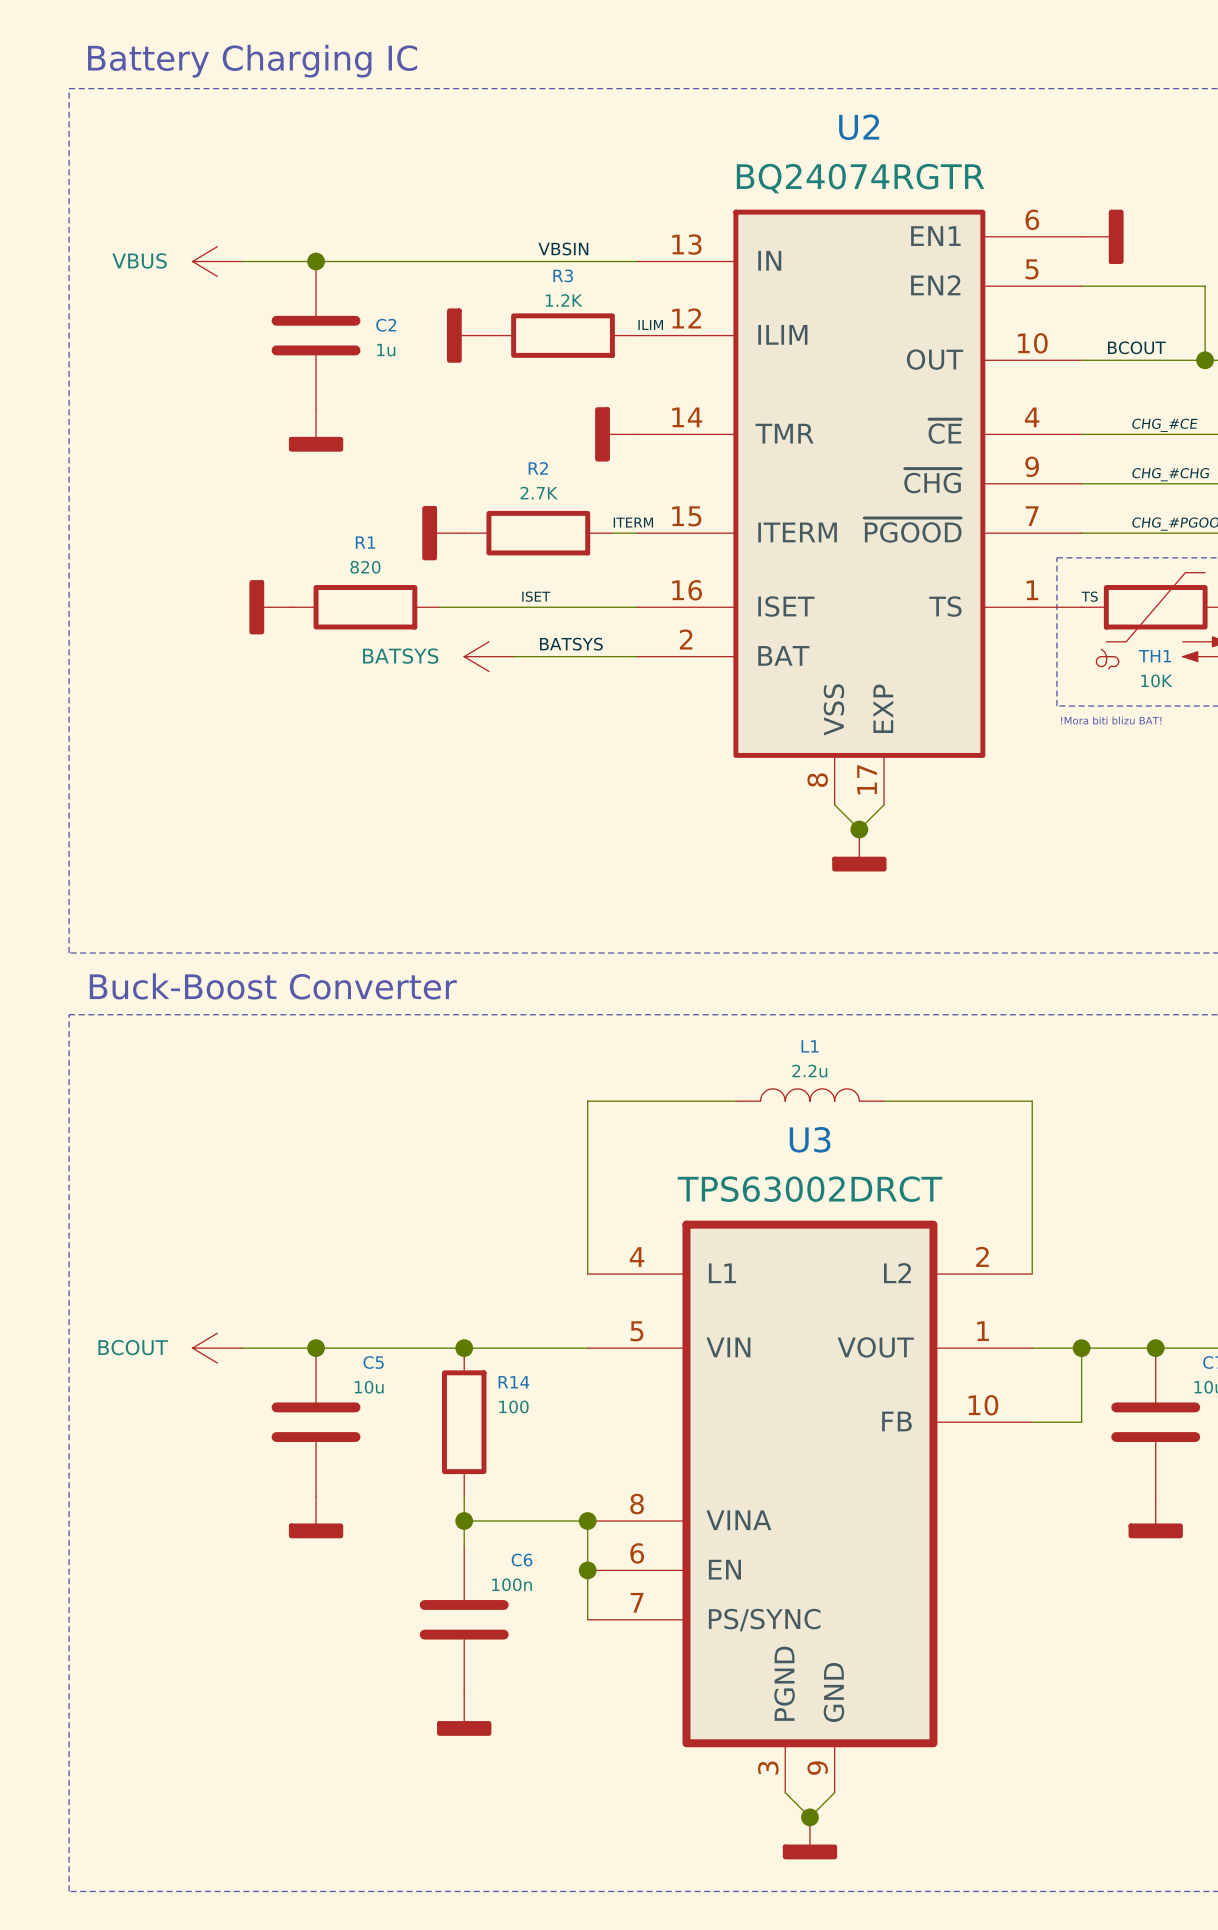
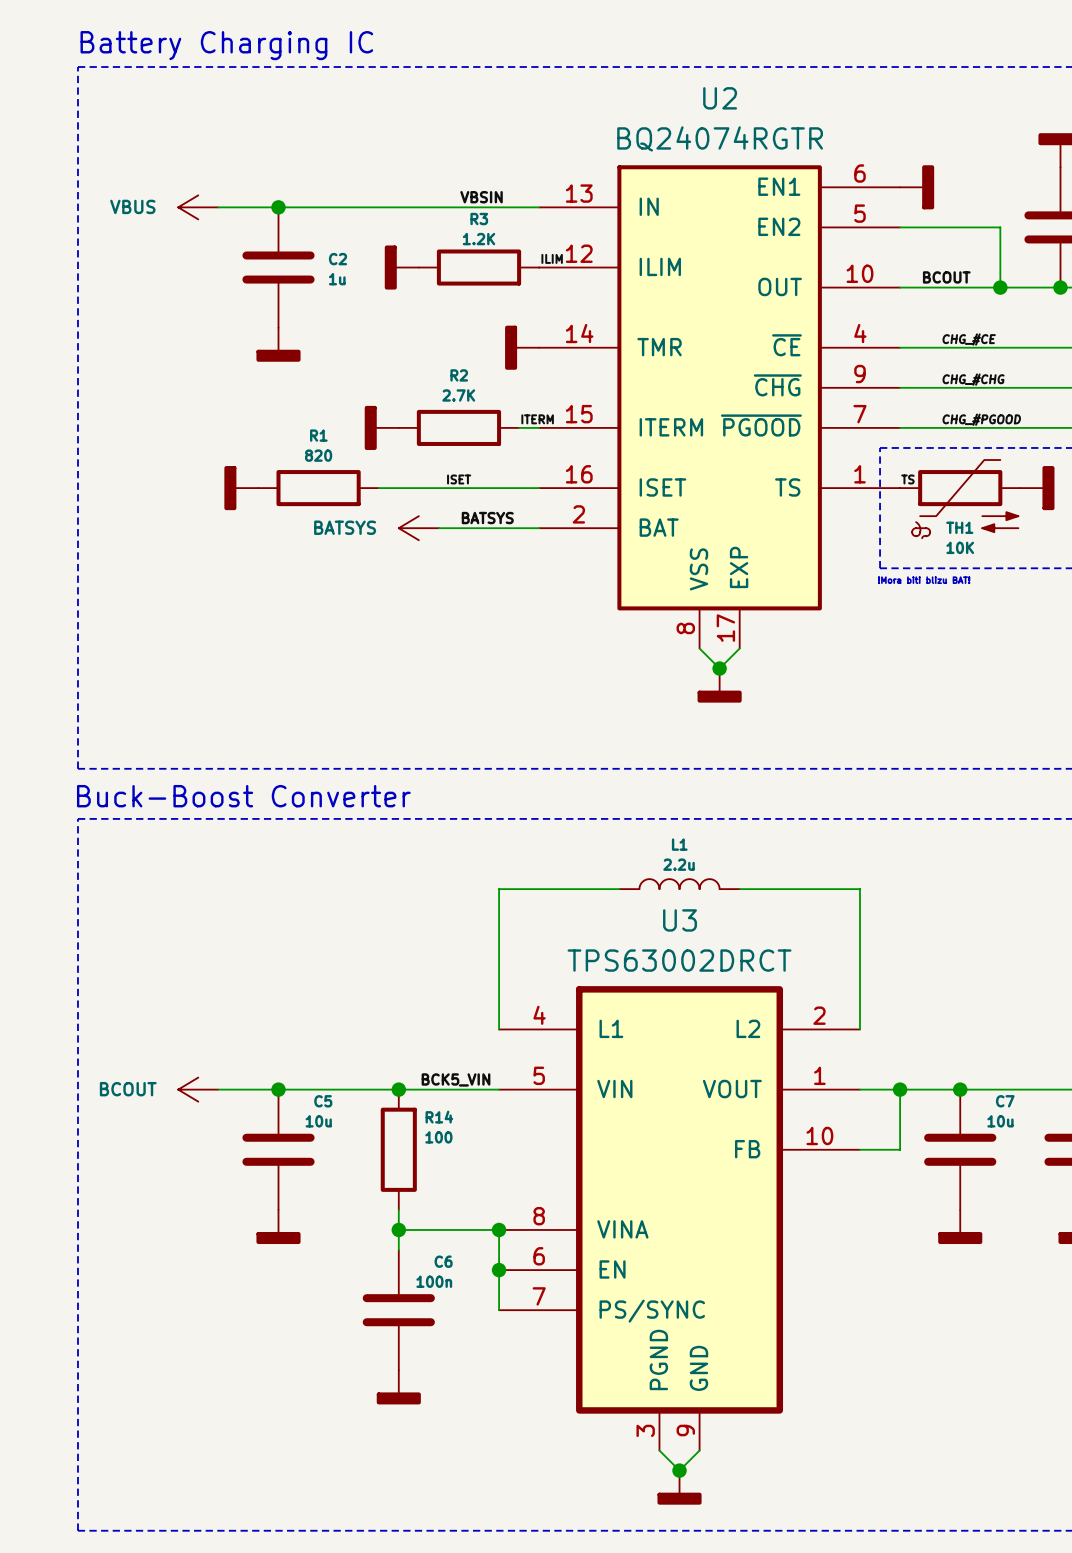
label: none -> BCK5_VIN (456, 1079)

